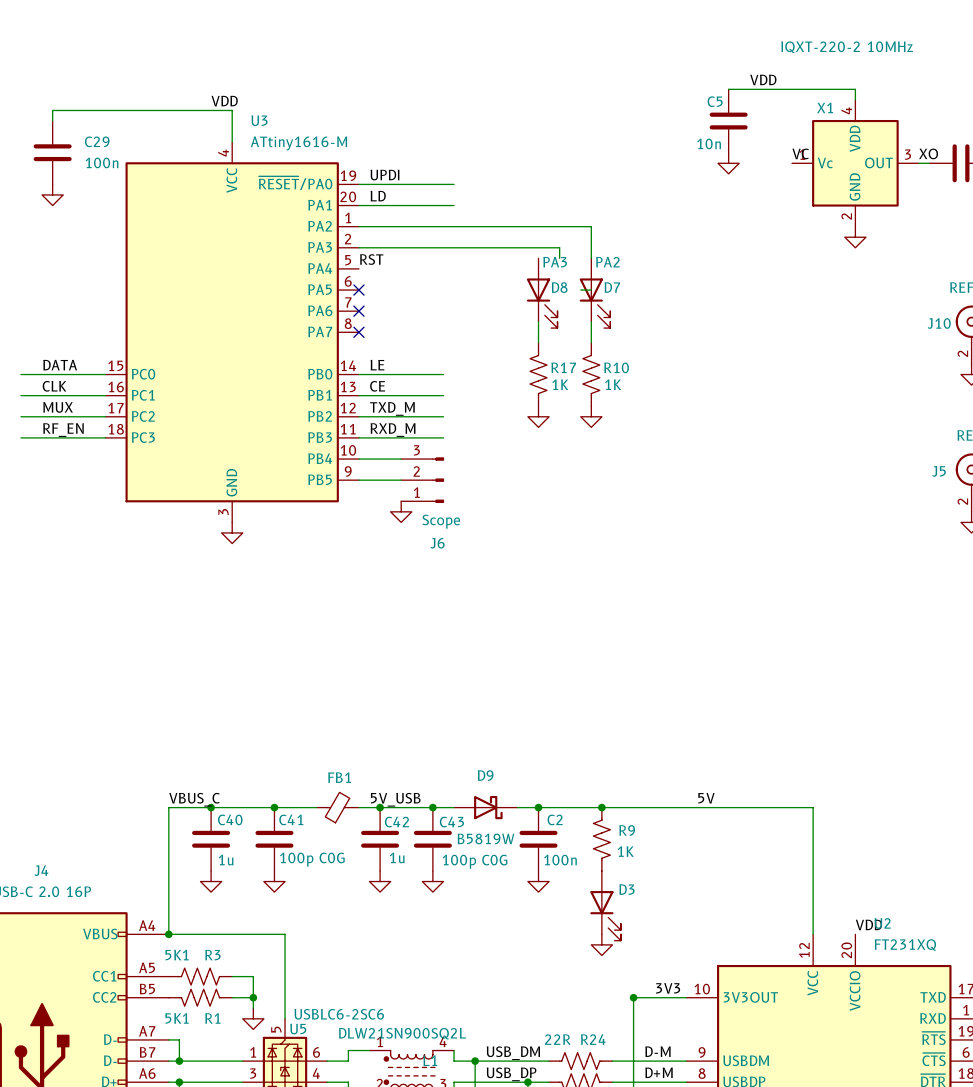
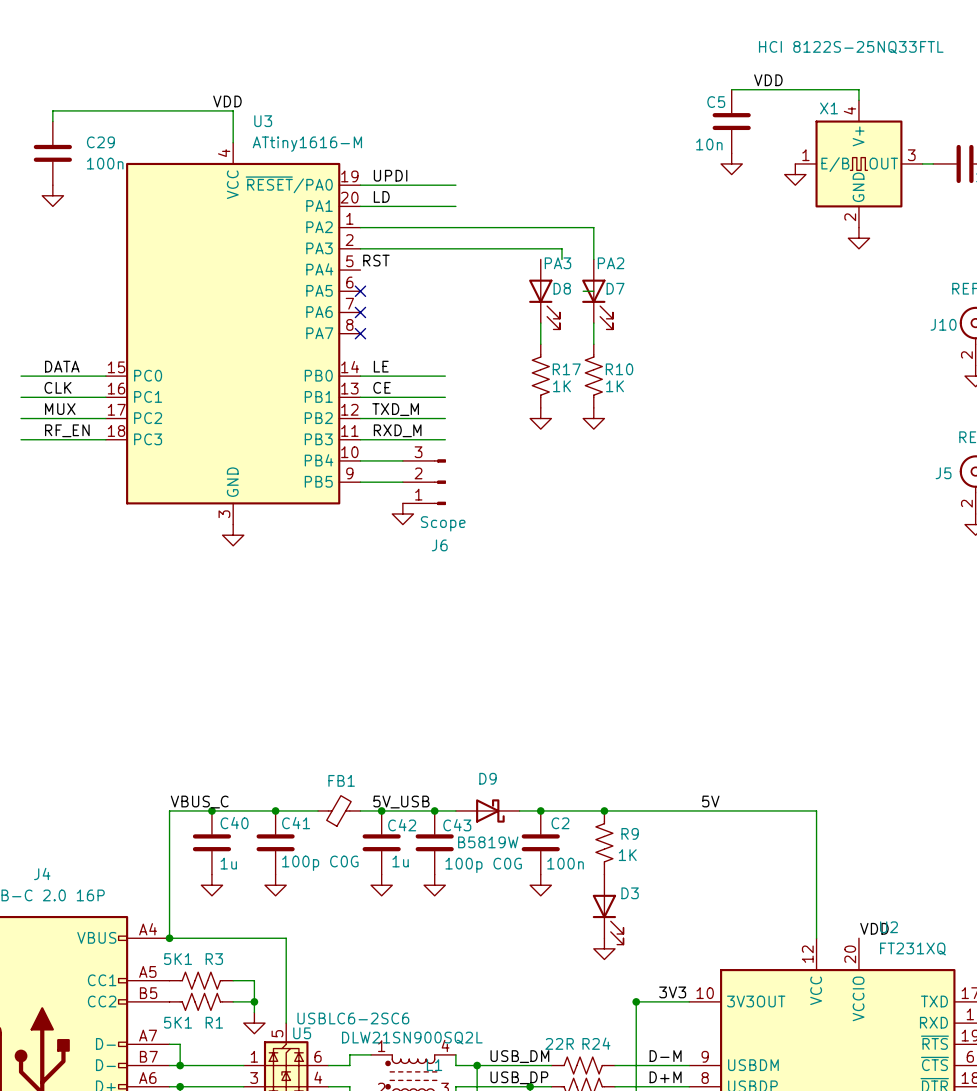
X1 value: IQXT-220-2 10MHz (847, 47) -> HCI 8122S-25NQ33FTL (851, 47)
X1 symbol: [792, 99, 919, 227] -> [795, 100, 923, 228]
label: VC (800, 153) -> none
label: XO (928, 153) -> none
power symbol: none -> (795, 174)

